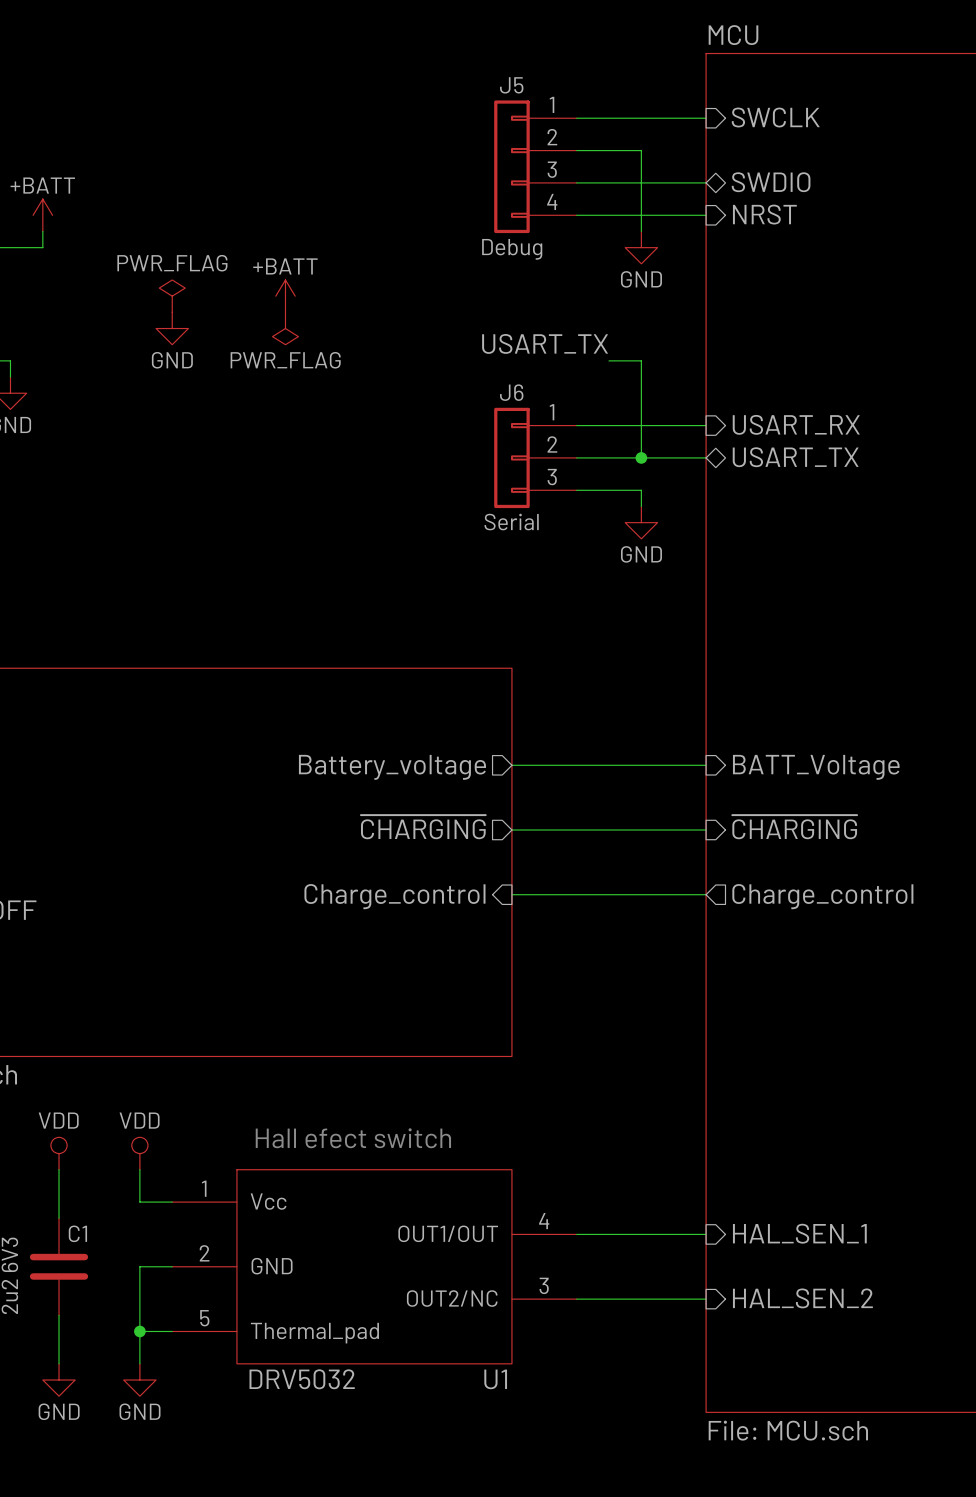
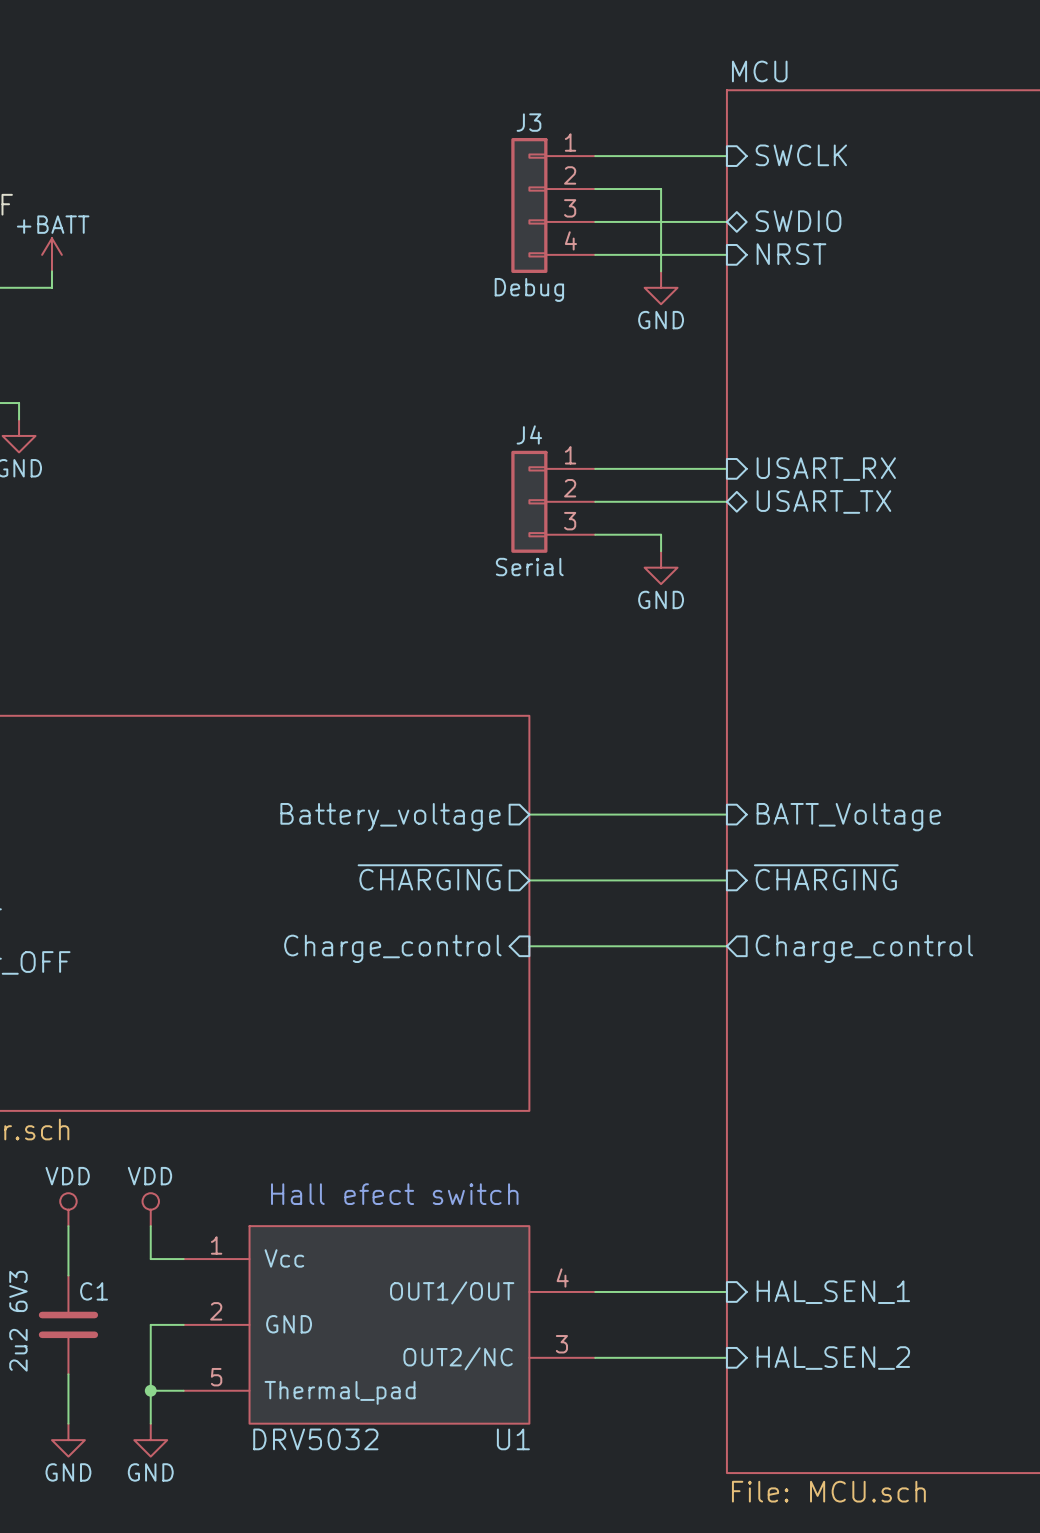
J5 name: J5 (511, 85) -> J3 (528, 122)
power symbol: PWR_FLAG (172, 296) -> none
power symbol: +BATT (285, 296) -> none
power symbol: GND (172, 328) -> none
power symbol: PWR_FLAG (285, 328) -> none
label: USART_TX (545, 343) -> none
wire: (609, 360) (641, 360) (641, 457) -> none
J6 name: J6 (511, 392) -> J4 (529, 434)
junction: (641, 457) -> none

